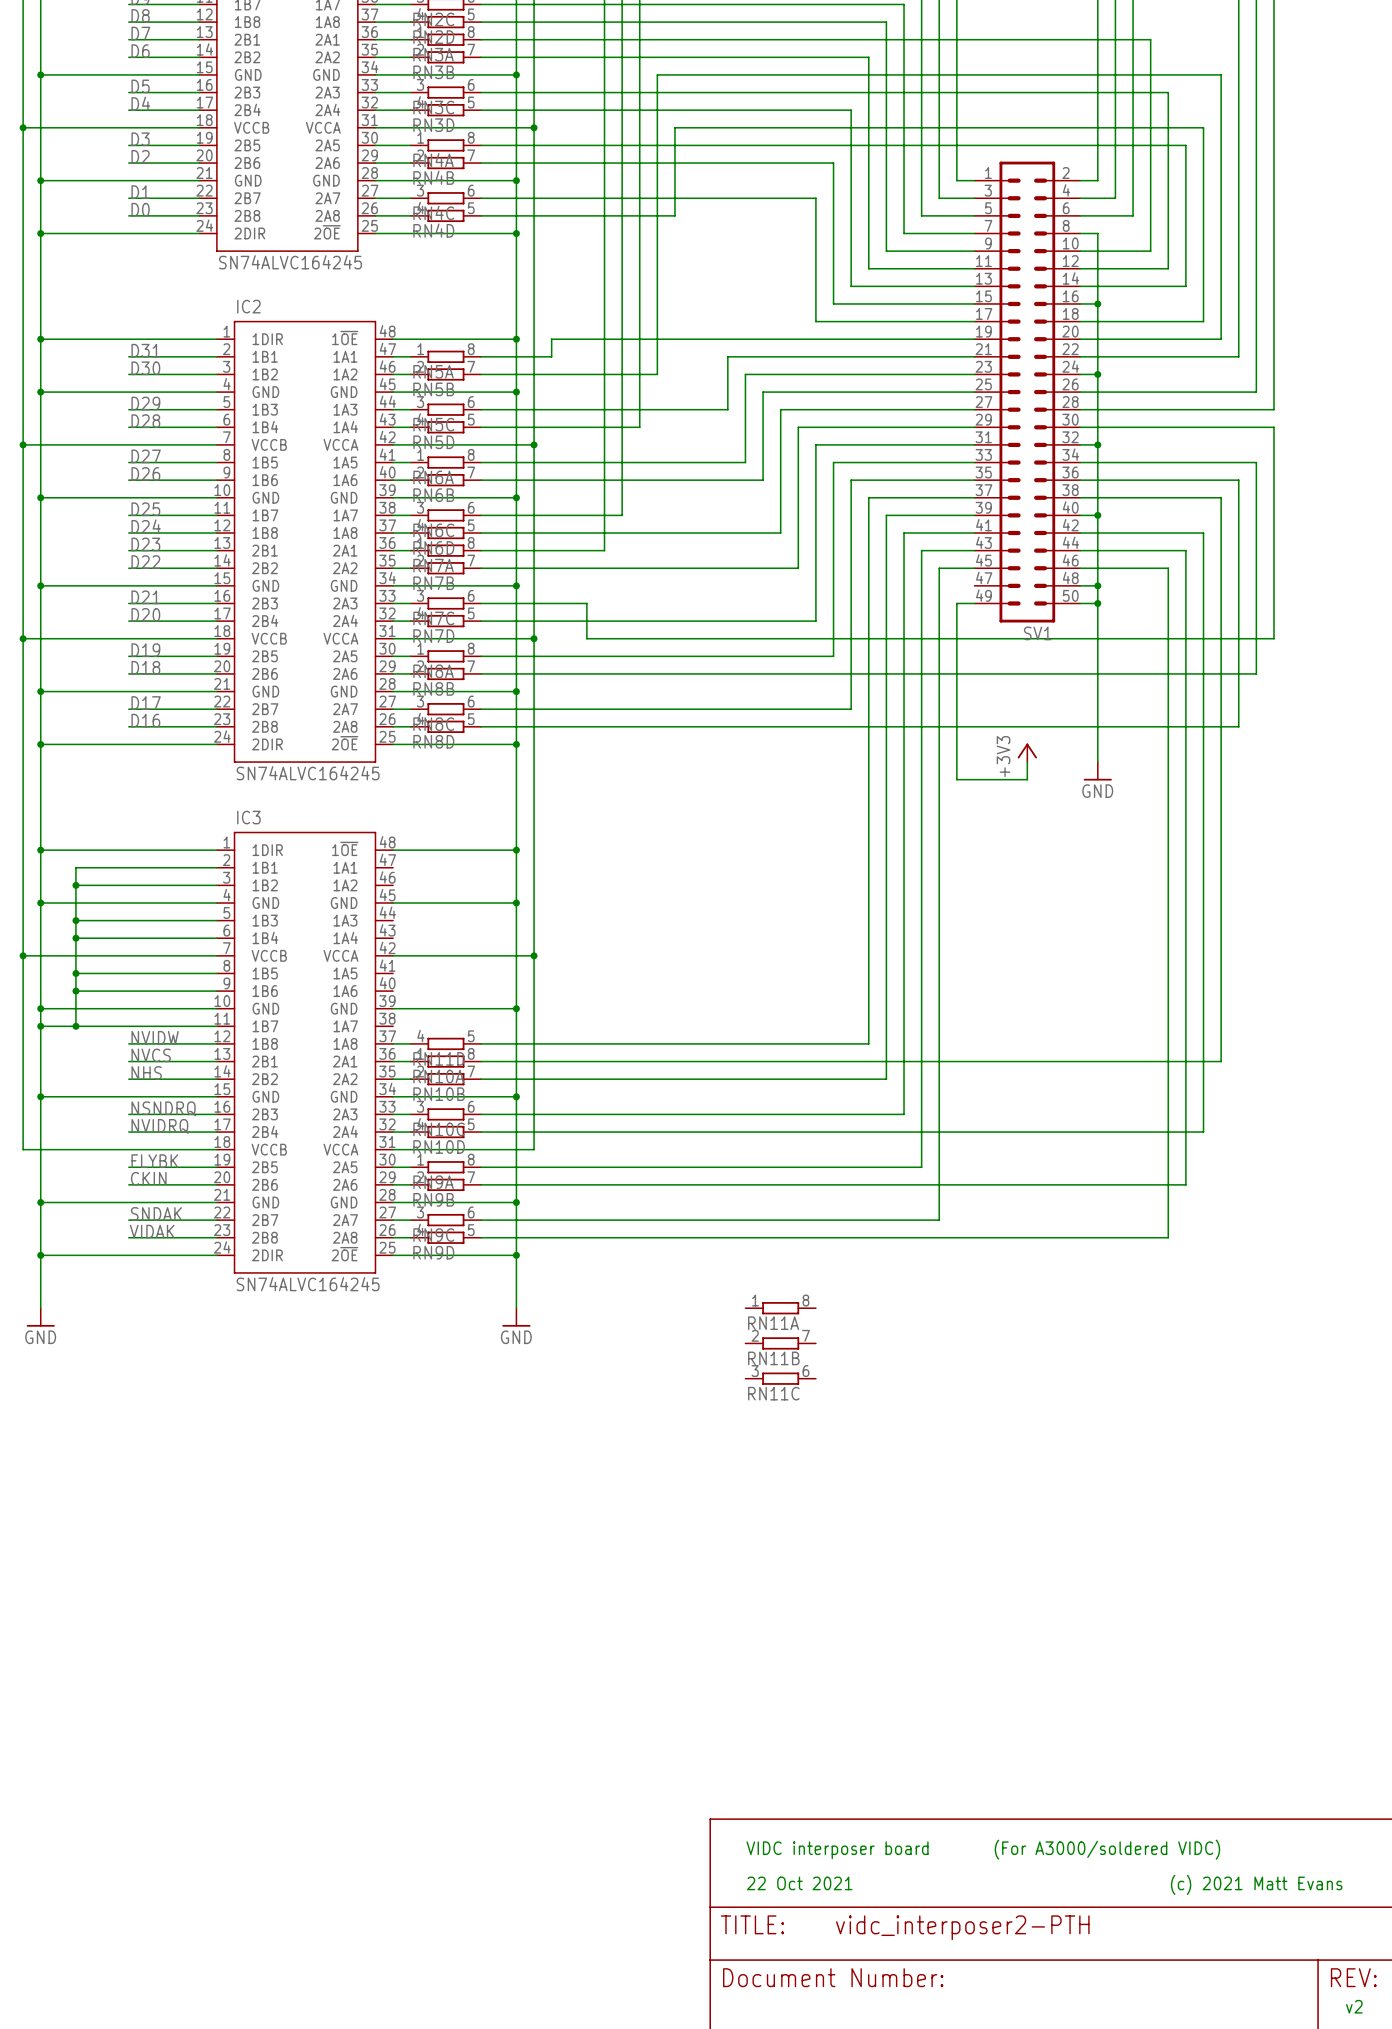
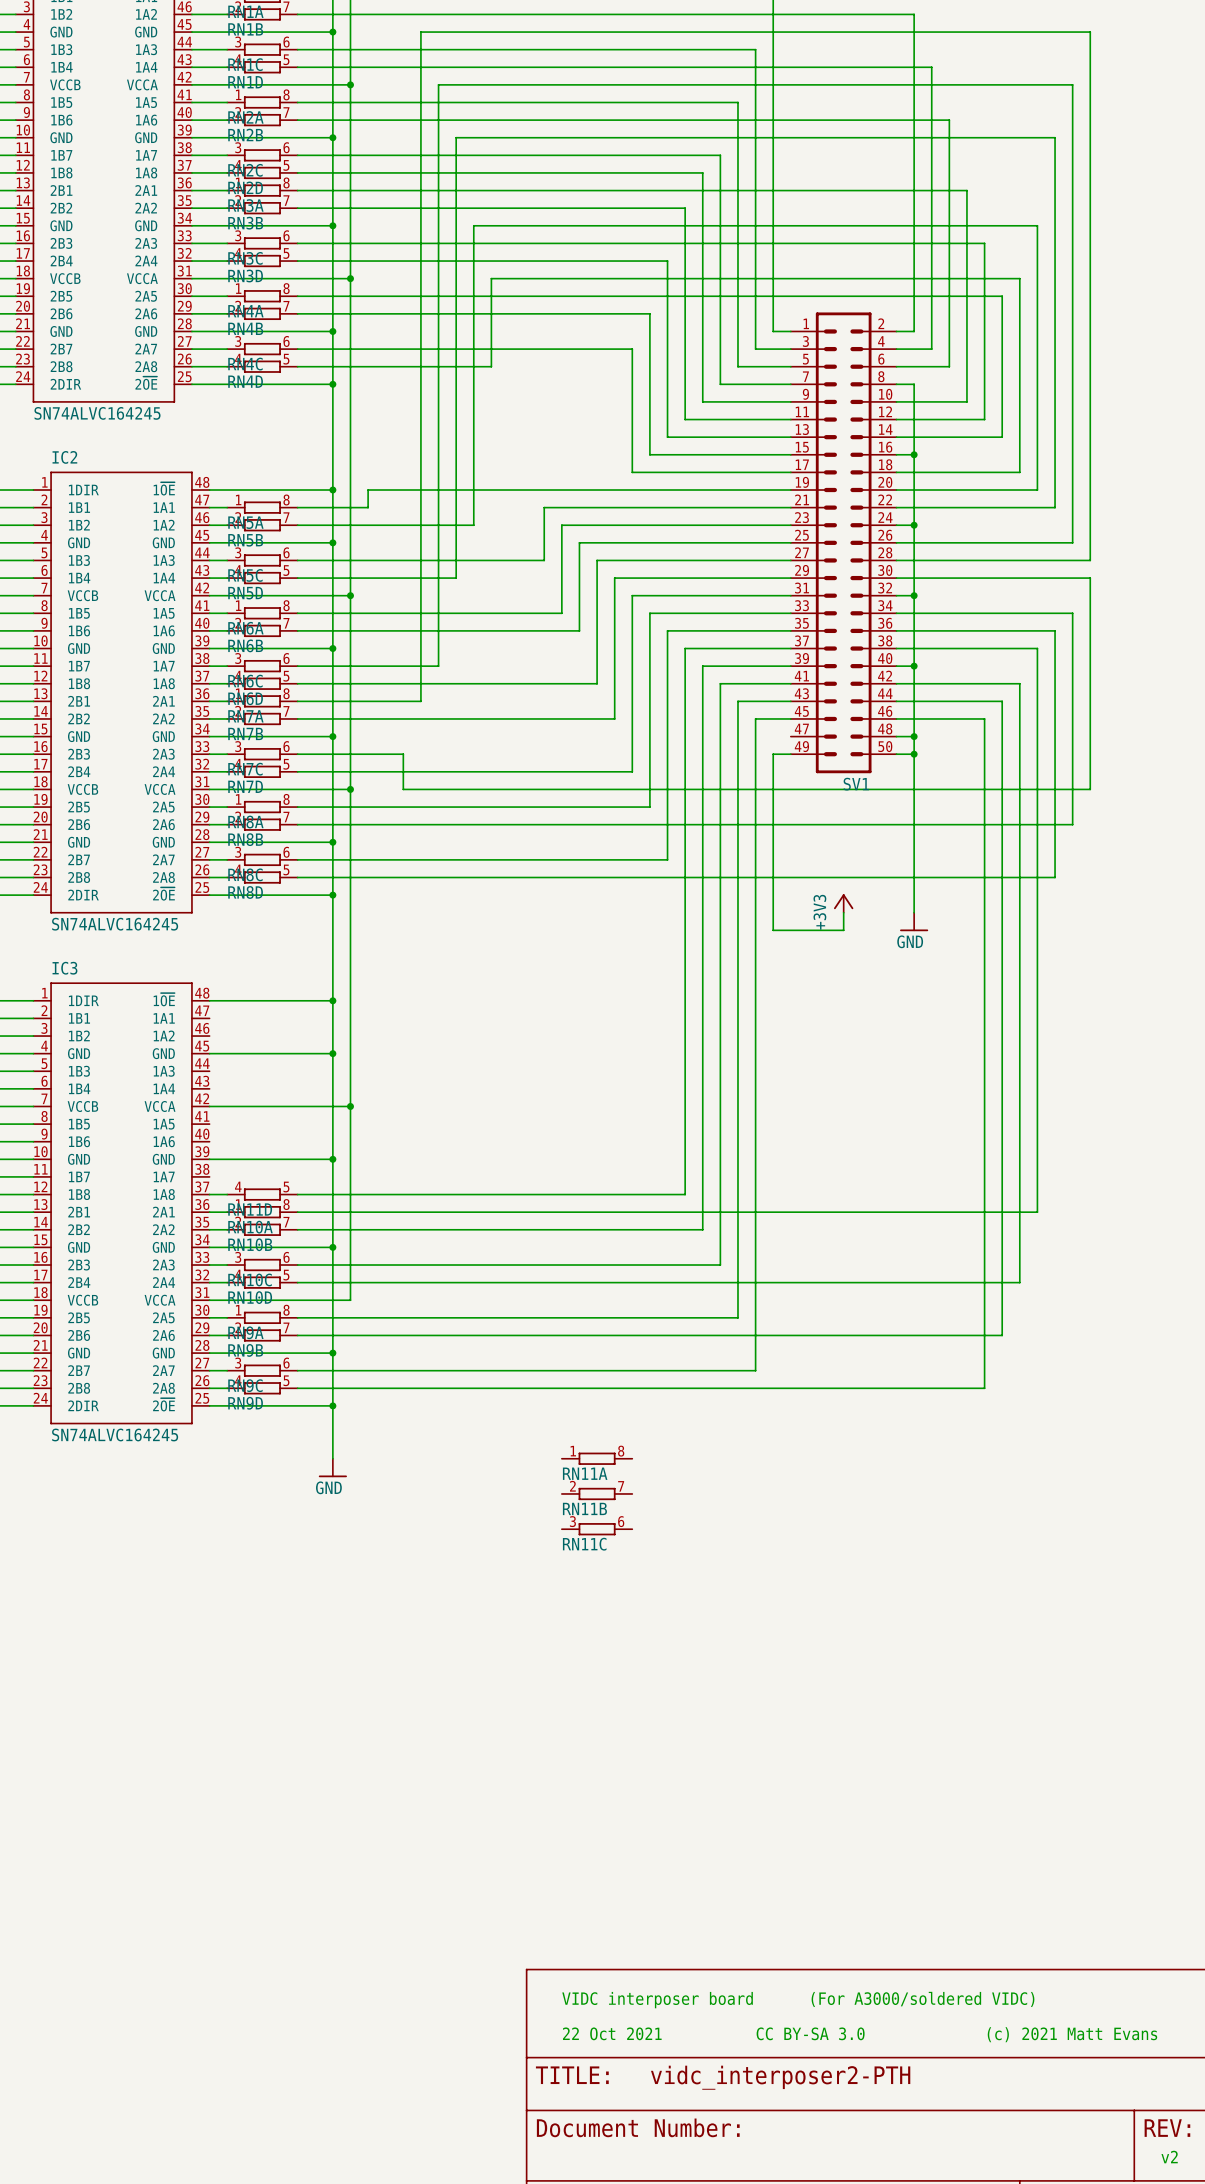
text: none -> CC BY-SA 3.0 (810, 2033)

